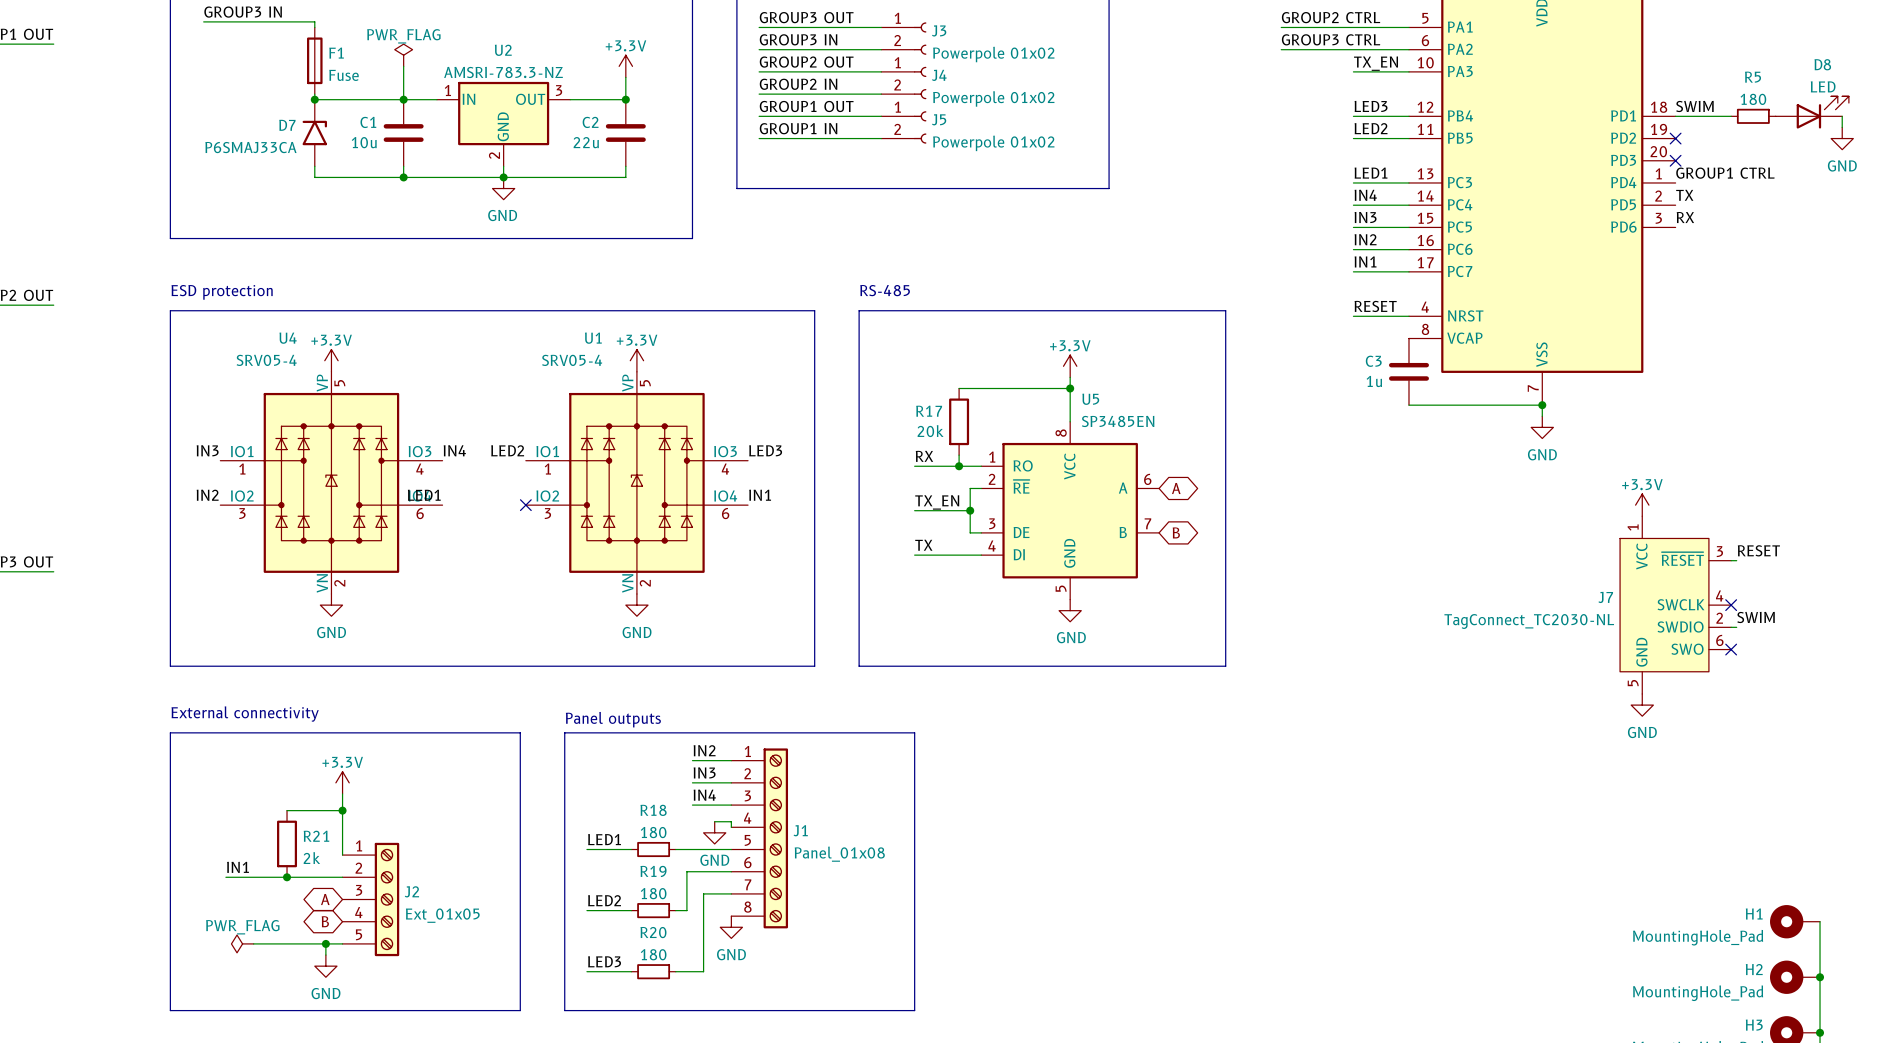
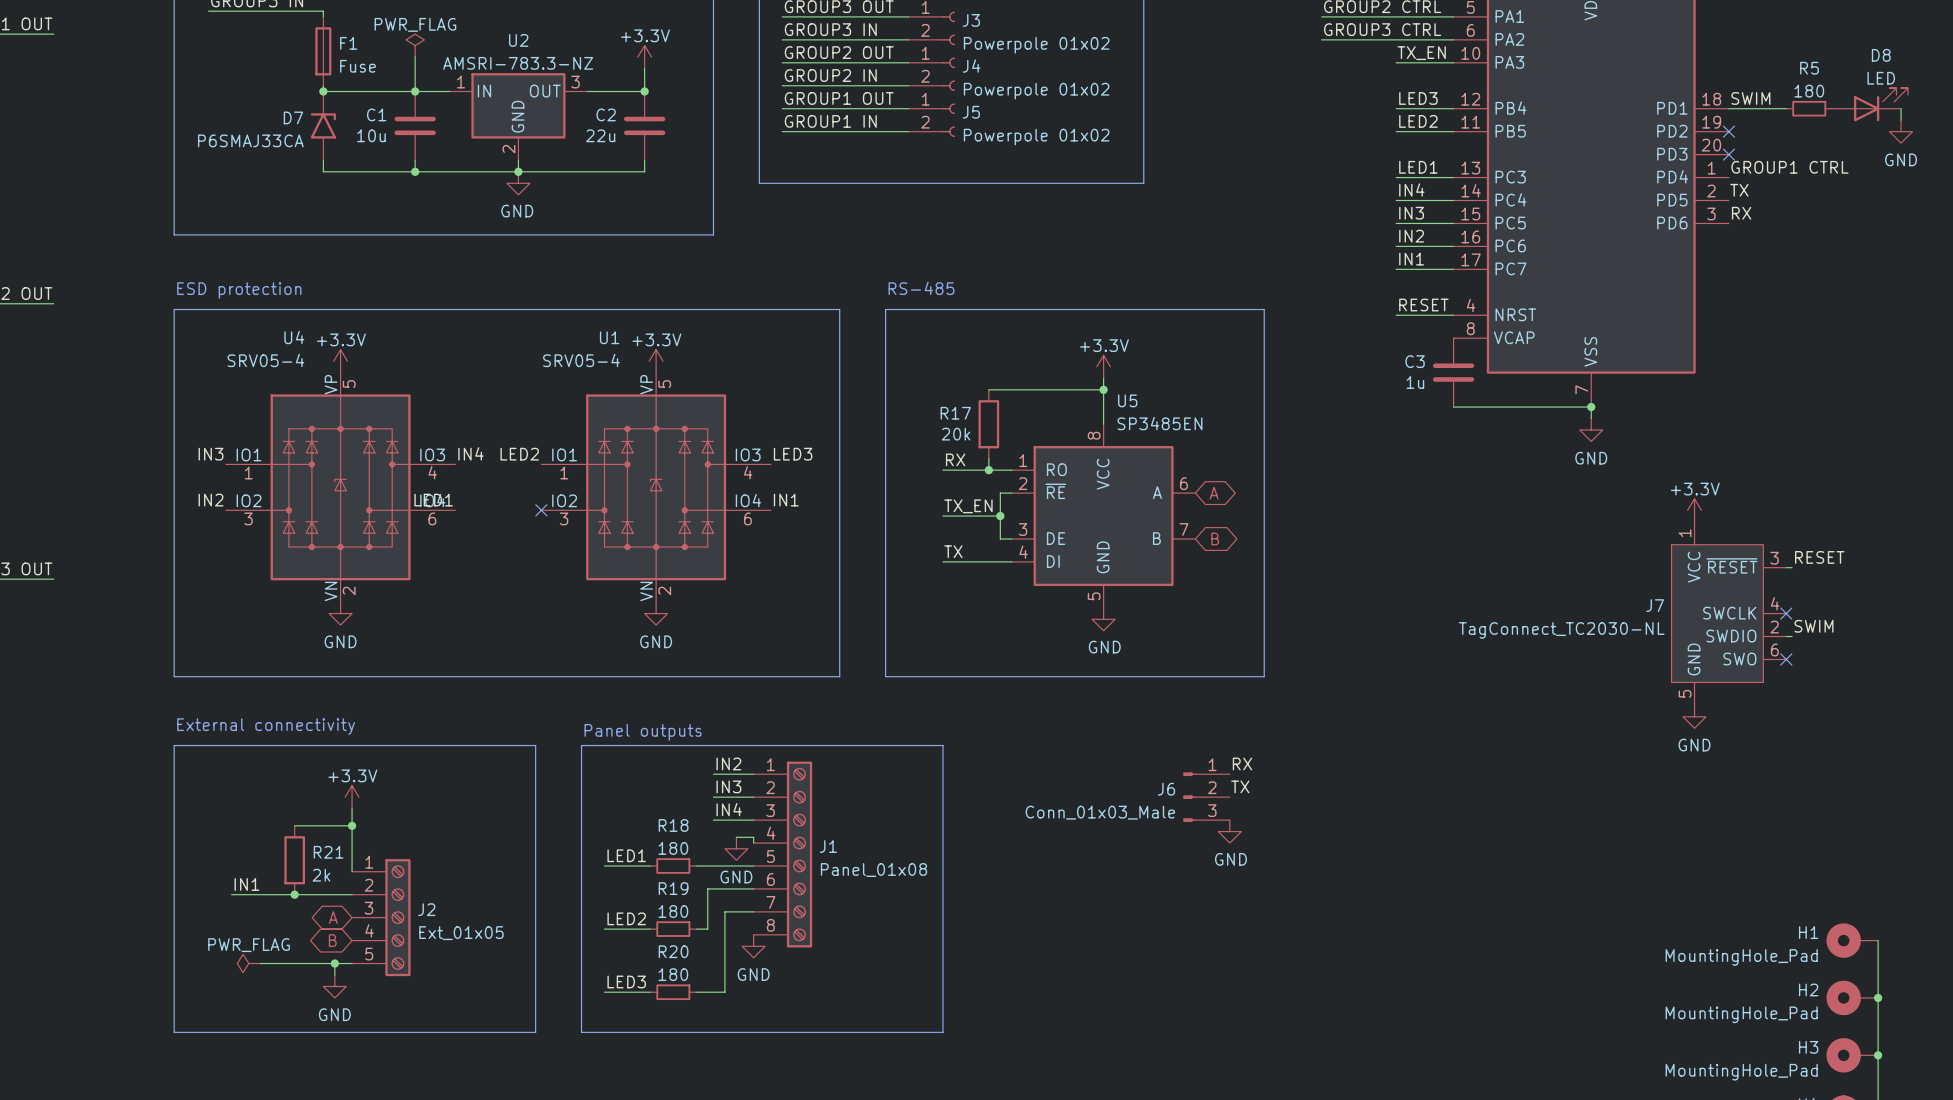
label: none -> RX (1242, 763)
label: none -> TX (1240, 786)
J6: none -> Conn_01x03_Male (1206, 797)
power symbol: none -> GND (1229, 831)

